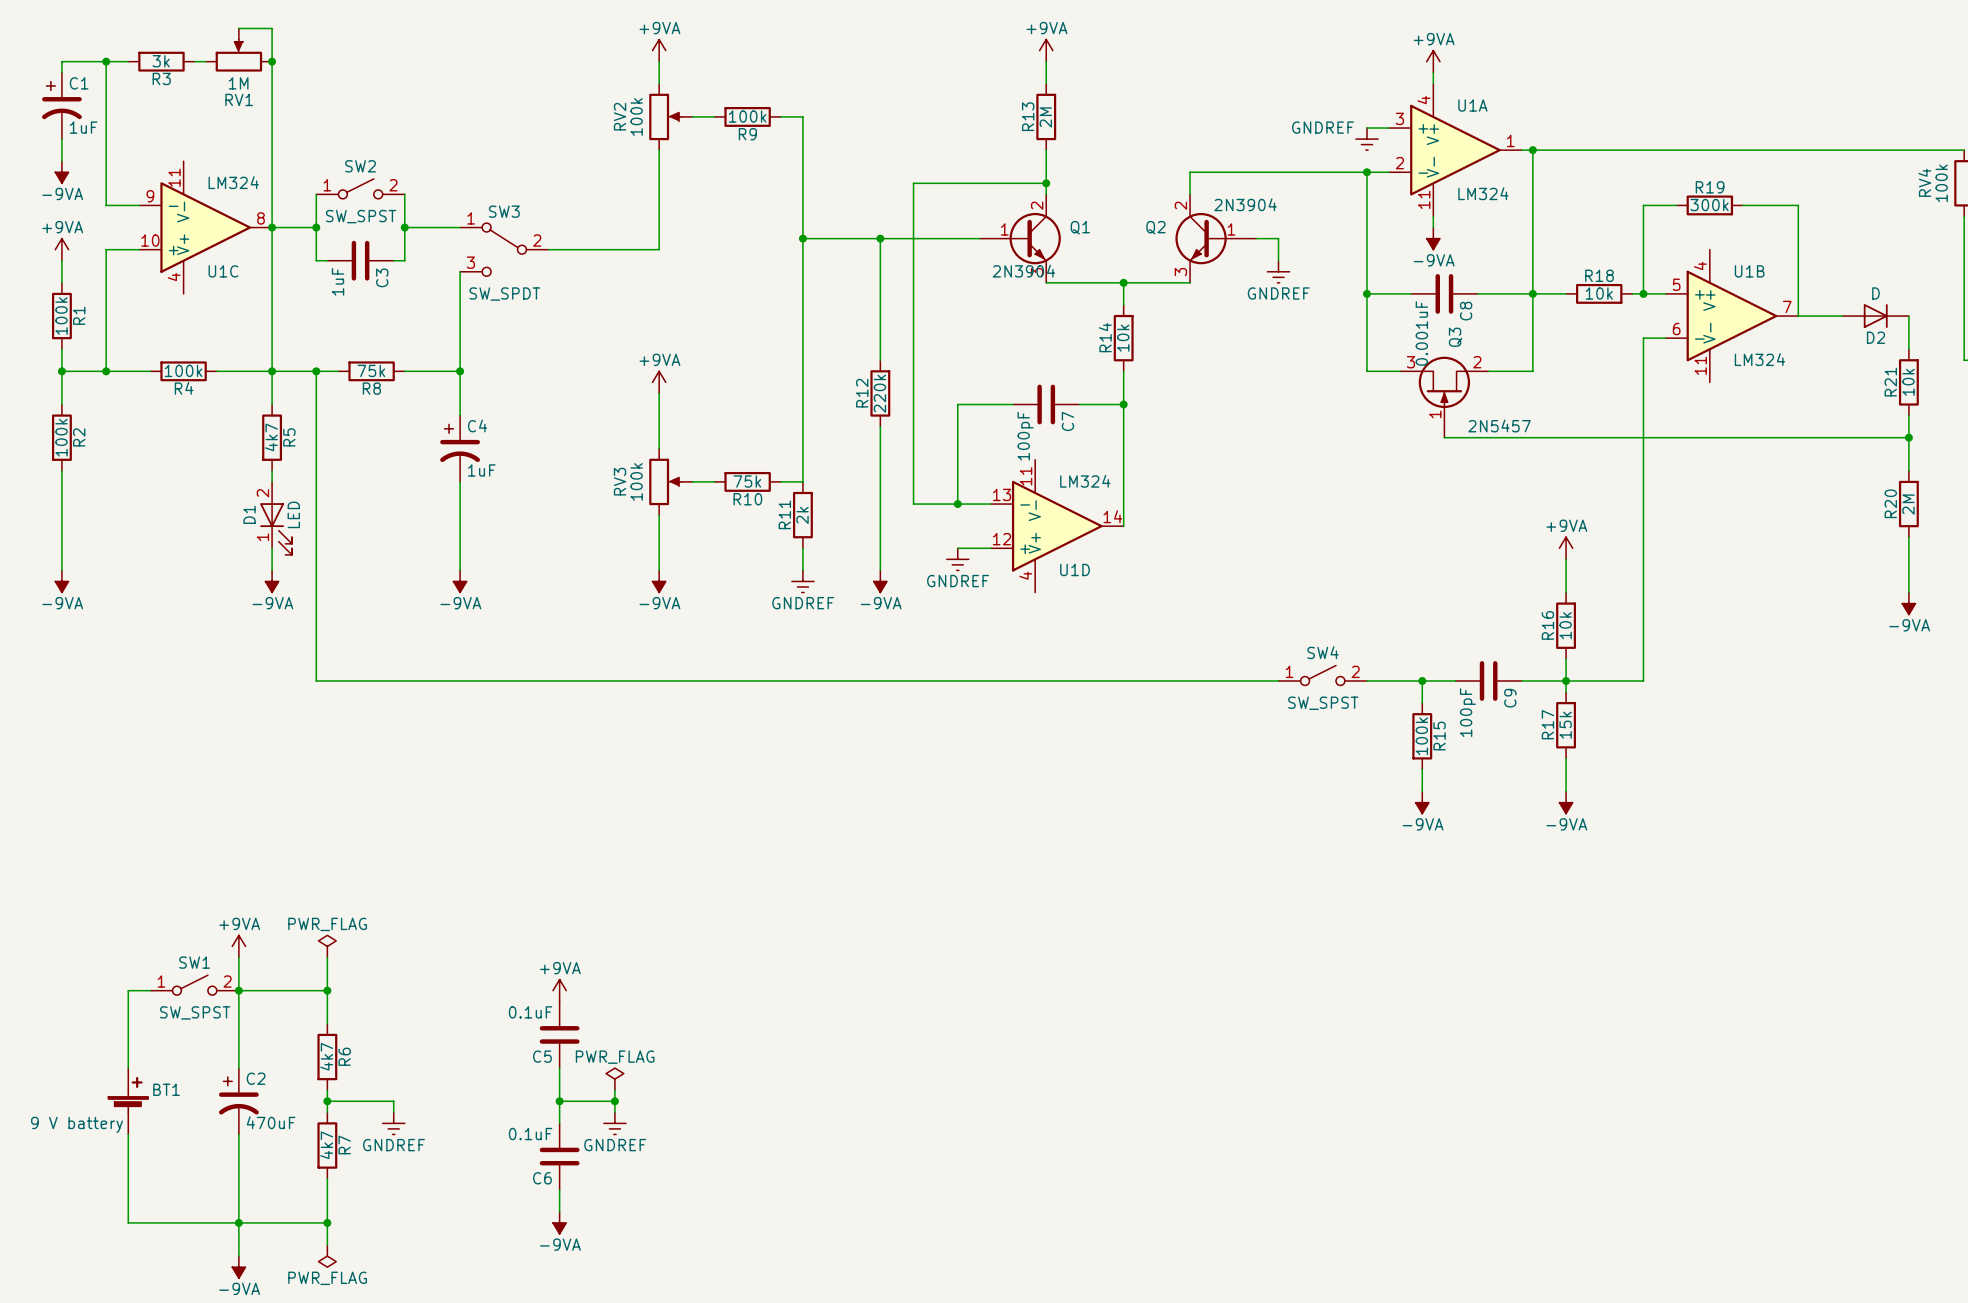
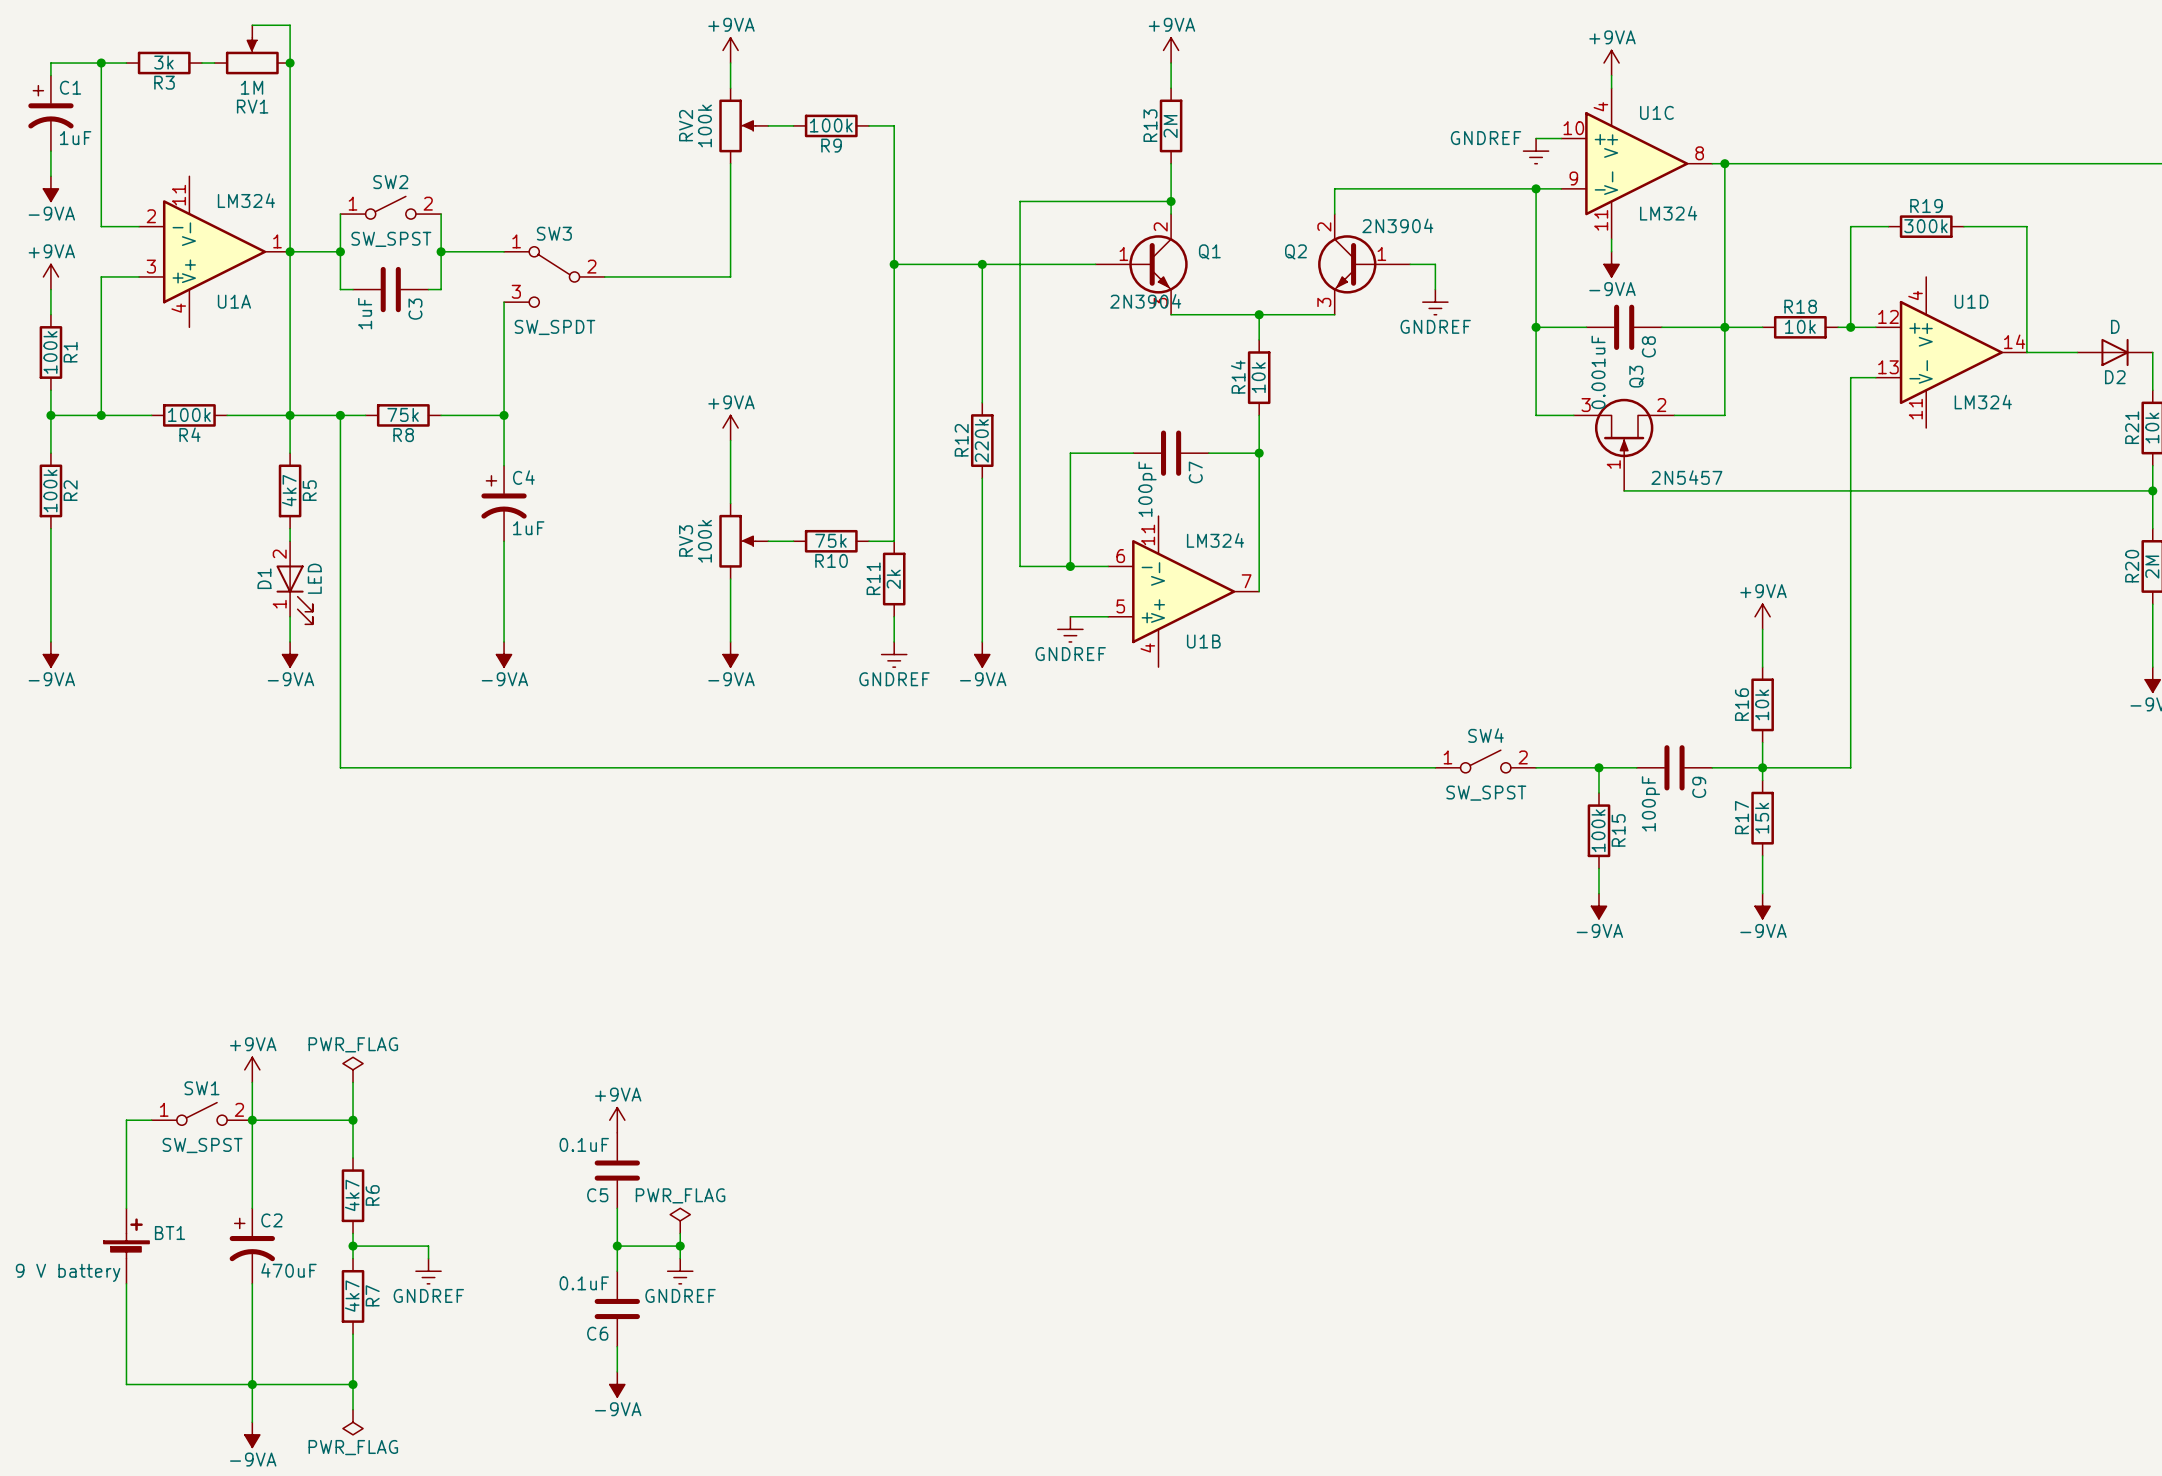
U1A flip: as is (1455, 150) -> up-down (214, 251)
U1A position: (1455, 150) -> (214, 251)
U1C flip: as is (205, 227) -> up-down (1636, 163)
U1C position: (205, 227) -> (1636, 163)
U1B flip: as is (1731, 316) -> up-down (1183, 591)
U1B position: (1731, 316) -> (1183, 591)
U1D flip: as is (1057, 526) -> up-down (1951, 352)
U1D position: (1057, 526) -> (1951, 352)

